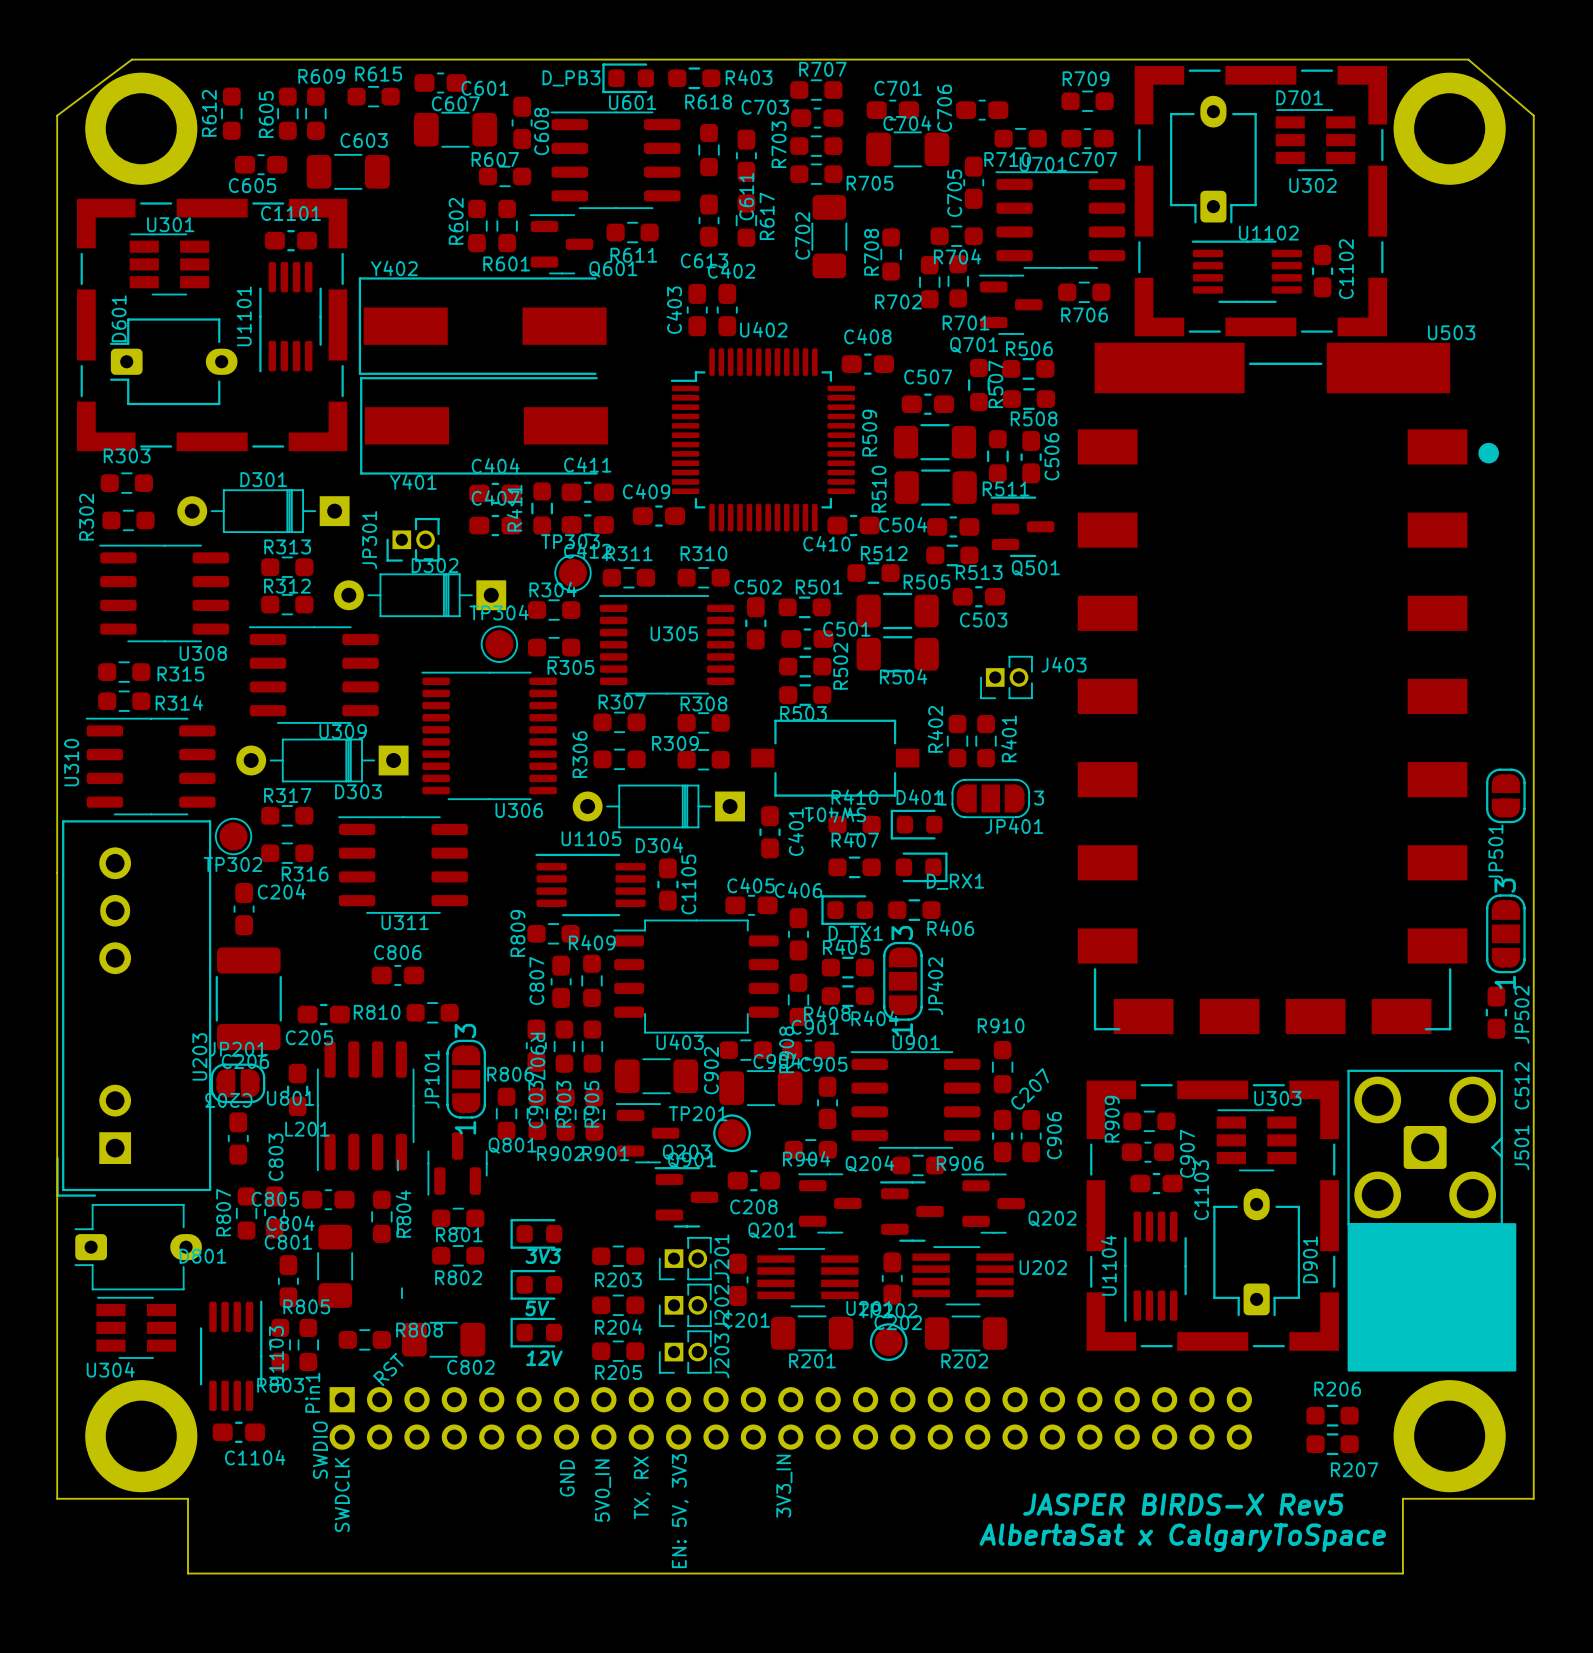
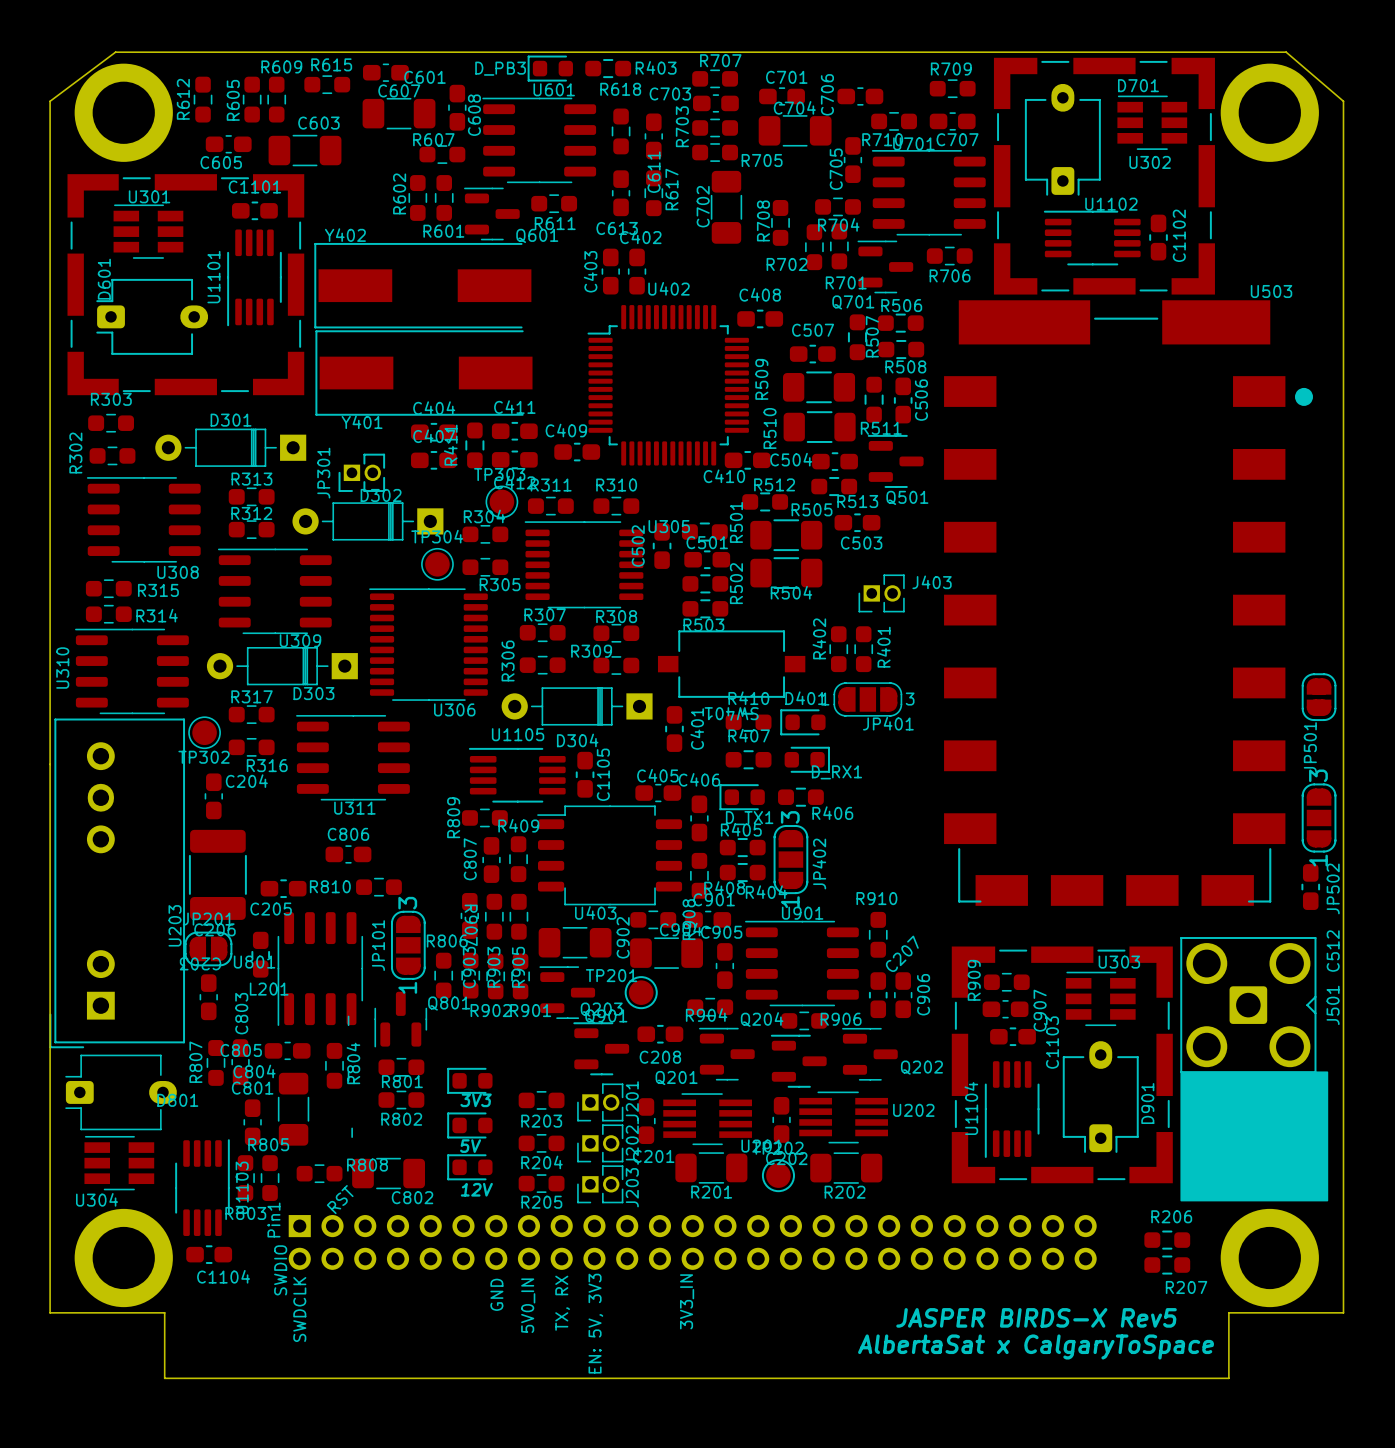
C502 name rotation: 0° (758, 587) -> 90° counterclockwise (638, 546)
R501 name rotation: 0° (819, 587) -> 90° counterclockwise (736, 522)
C501 name position: C501 (846, 629) -> C501 (707, 542)
U305 name position: U305 (674, 633) -> U305 (669, 526)

